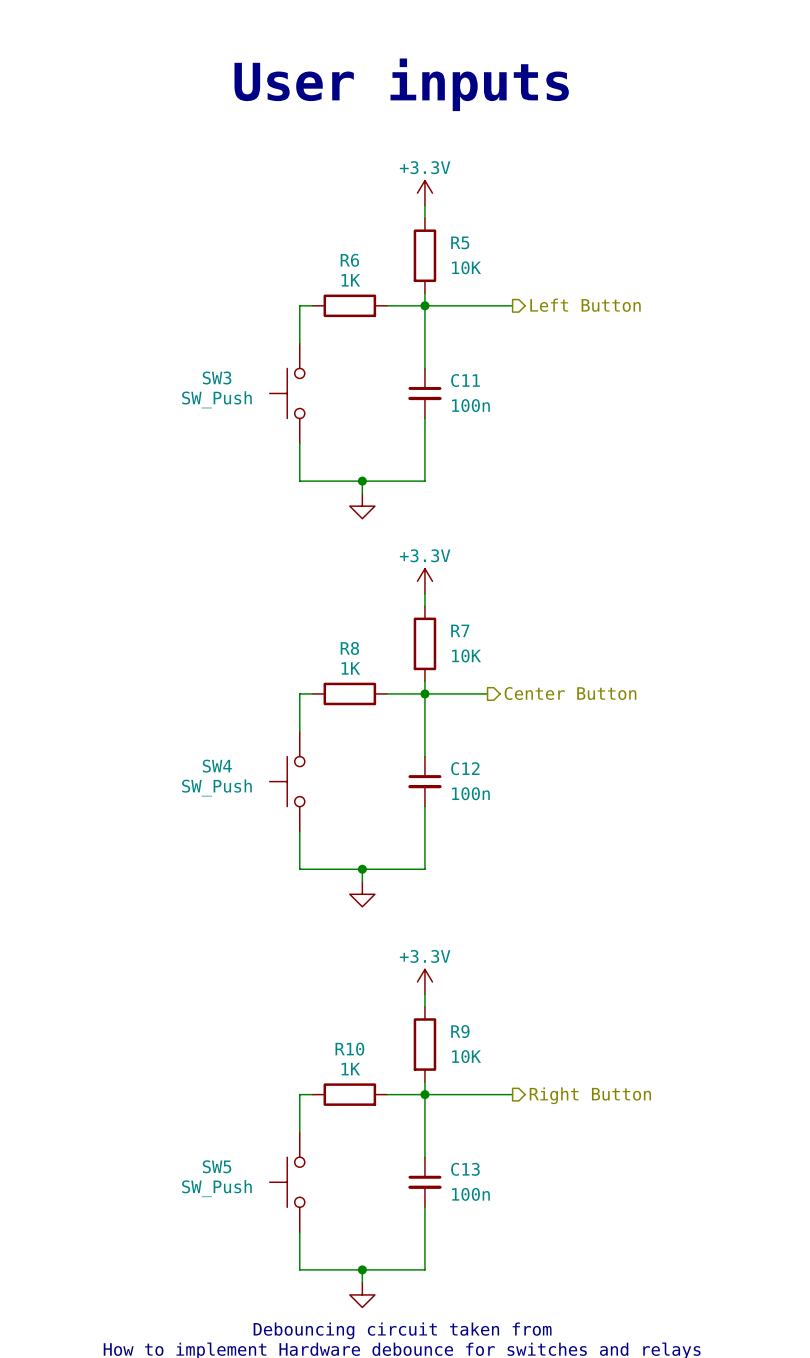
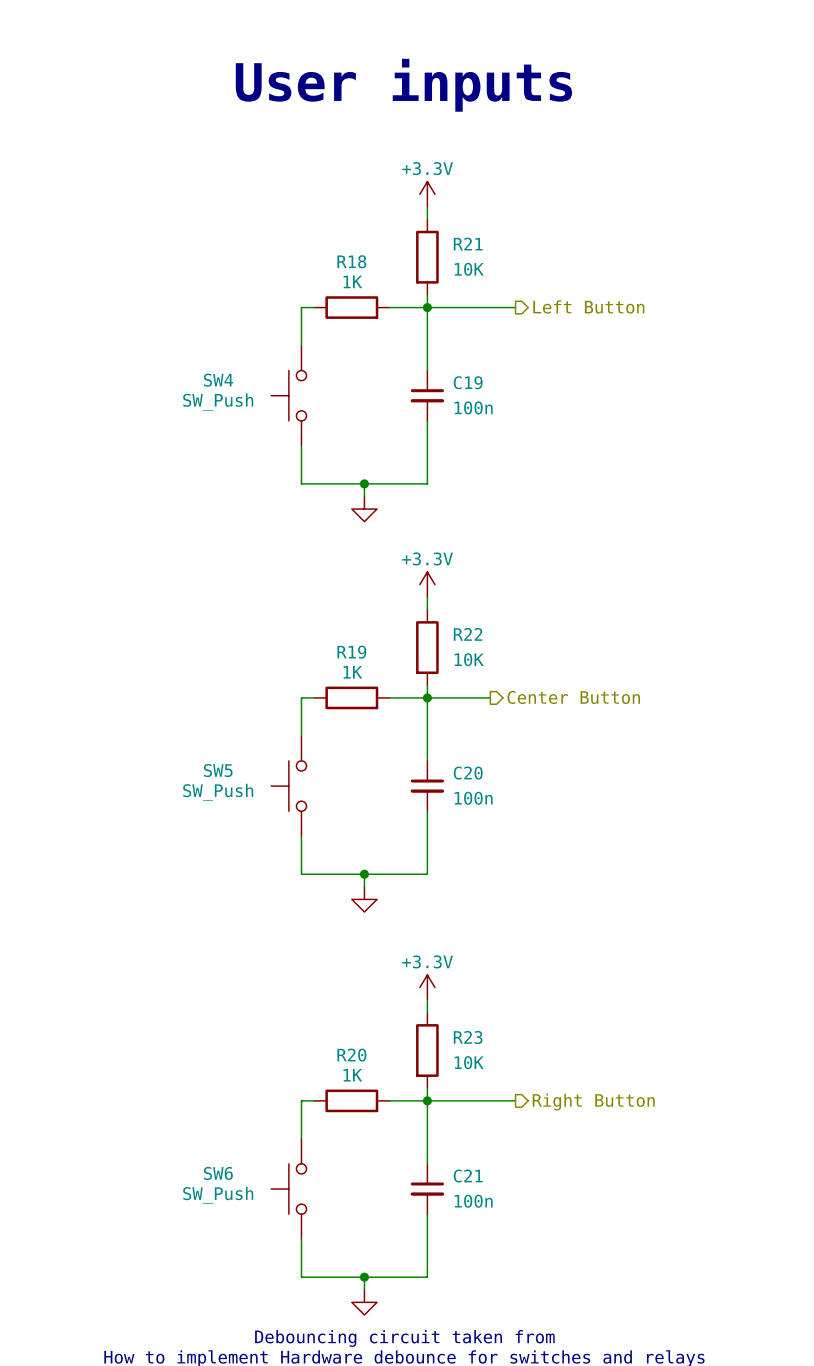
R5 name: R5 (460, 242) -> R21 (468, 244)
R6 name: R6 (349, 260) -> R18 (351, 261)
SW3 name: SW3 (217, 377) -> SW4 (218, 380)
C11 name: C11 (465, 380) -> C19 (468, 382)
R7 name: R7 (460, 630) -> R22 (468, 634)
R8 name: R8 (349, 648) -> R19 (351, 652)
SW4 name: SW4 (217, 766) -> SW5 (218, 770)
C12 name: C12 (465, 768) -> C20 (468, 773)
R9 name: R9 (460, 1031) -> R23 (468, 1037)
R10 name: R10 (349, 1049) -> R20 (351, 1055)
SW5 name: SW5 (217, 1166) -> SW6 (218, 1173)
C13 name: C13 (465, 1169) -> C21 (468, 1176)

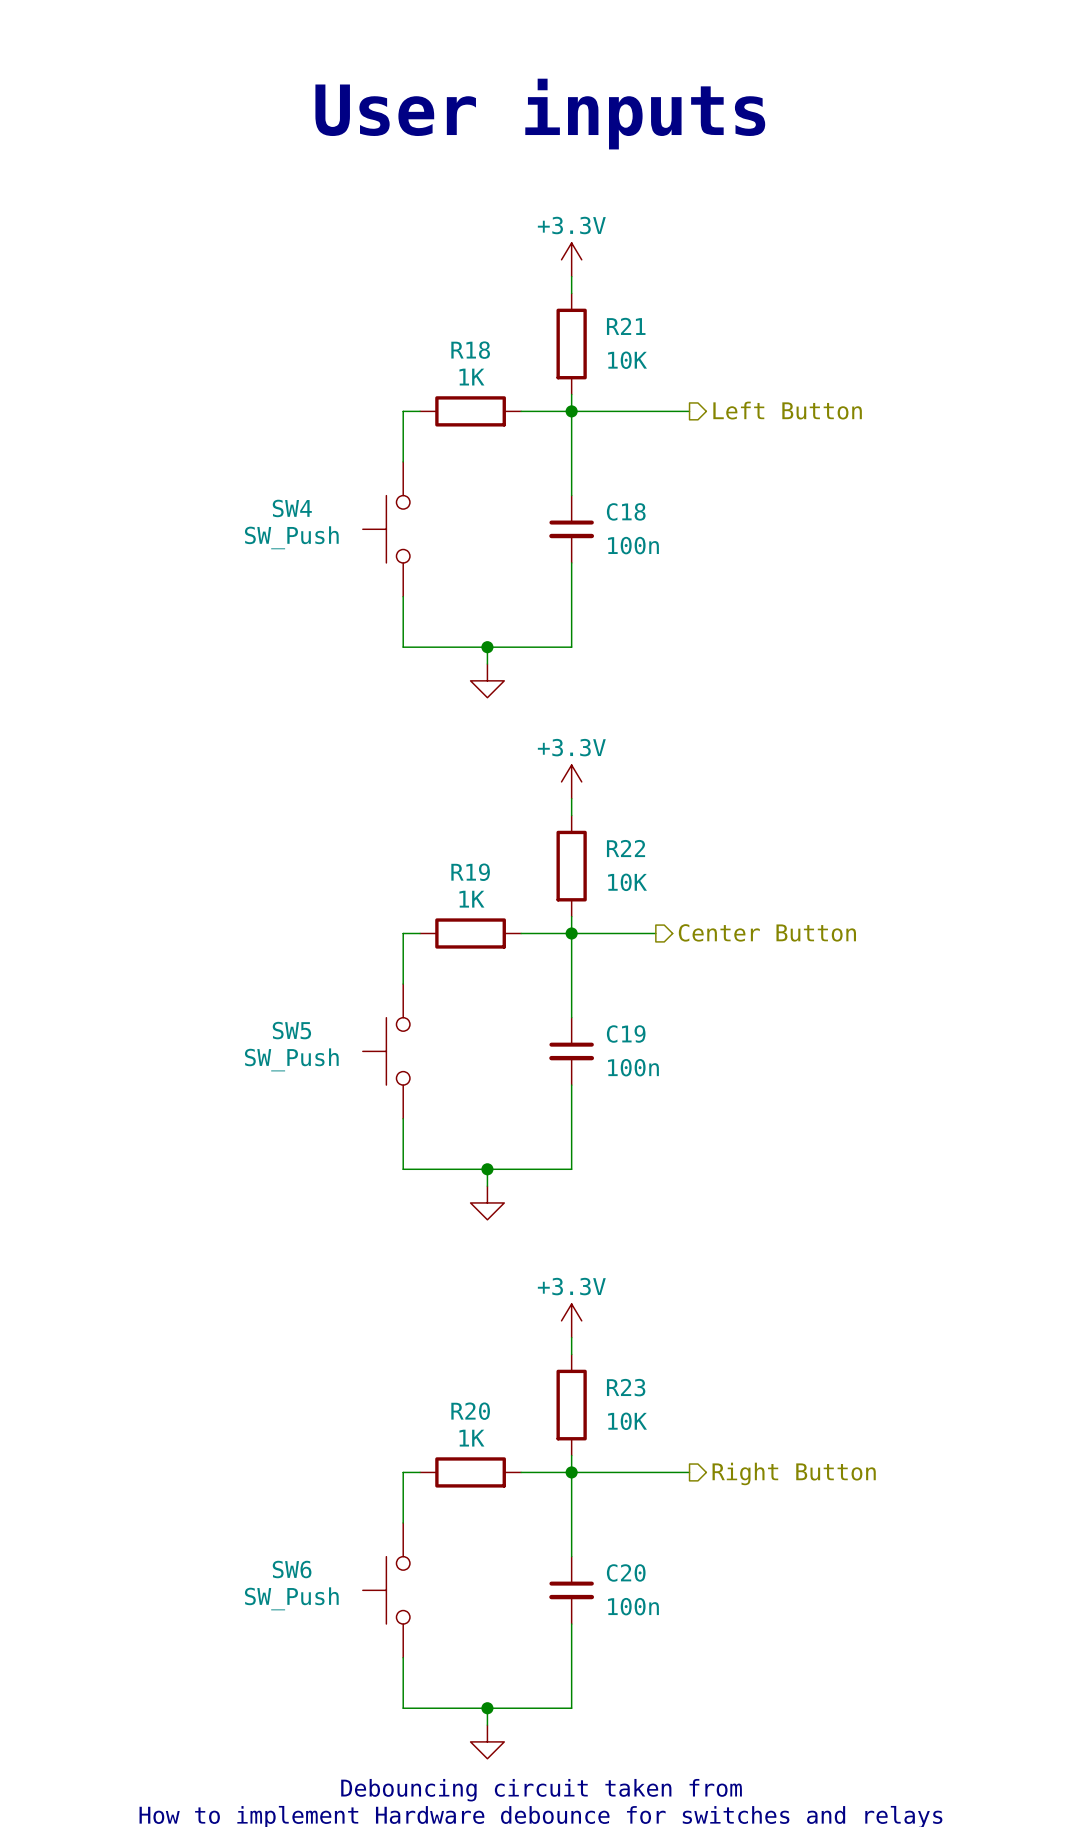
C19 name: C19 (468, 382) -> C18 (626, 511)
C20 name: C20 (468, 773) -> C19 (626, 1034)
C21 name: C21 (468, 1176) -> C20 (626, 1572)

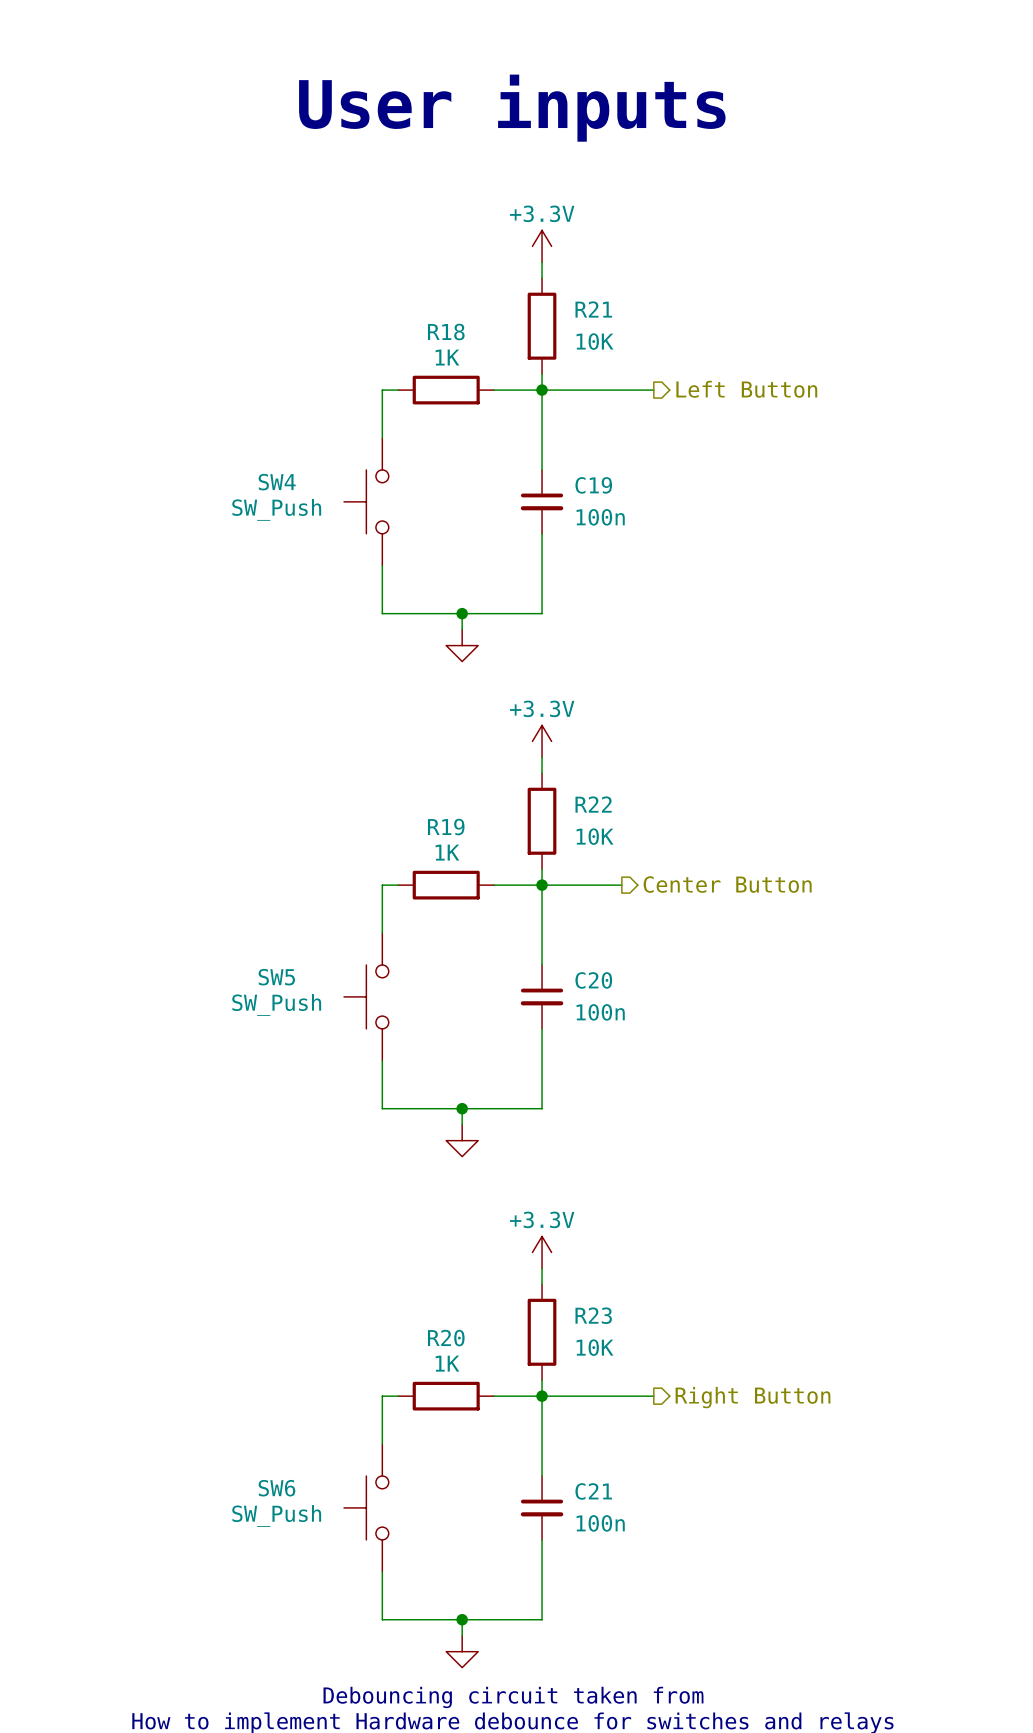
C18 name: C18 (626, 511) -> C19 (593, 485)
C19 name: C19 (626, 1034) -> C20 (593, 980)
C20 name: C20 (626, 1572) -> C21 (593, 1491)

